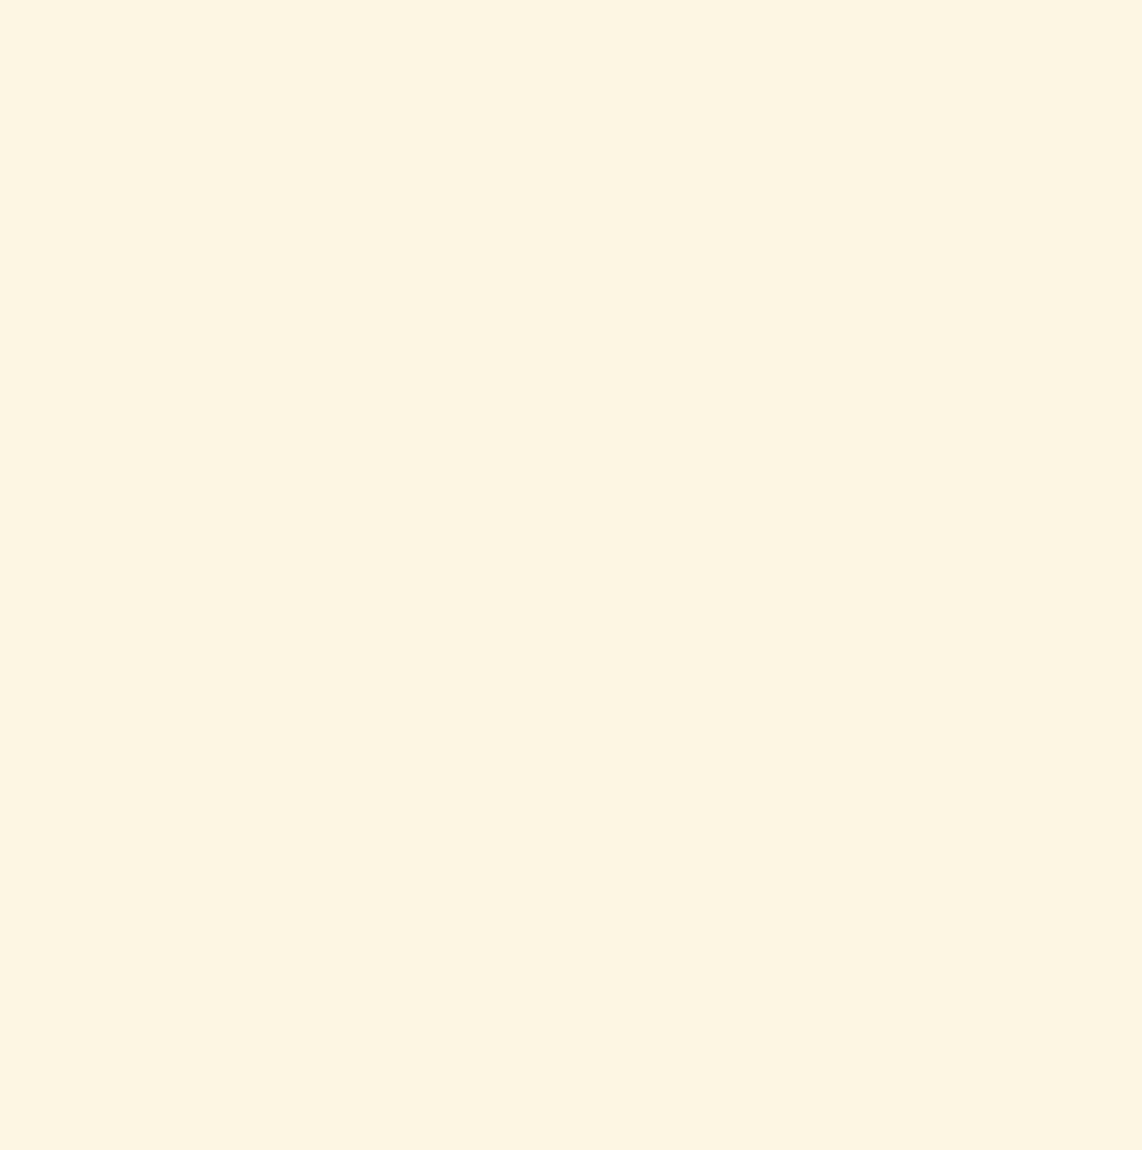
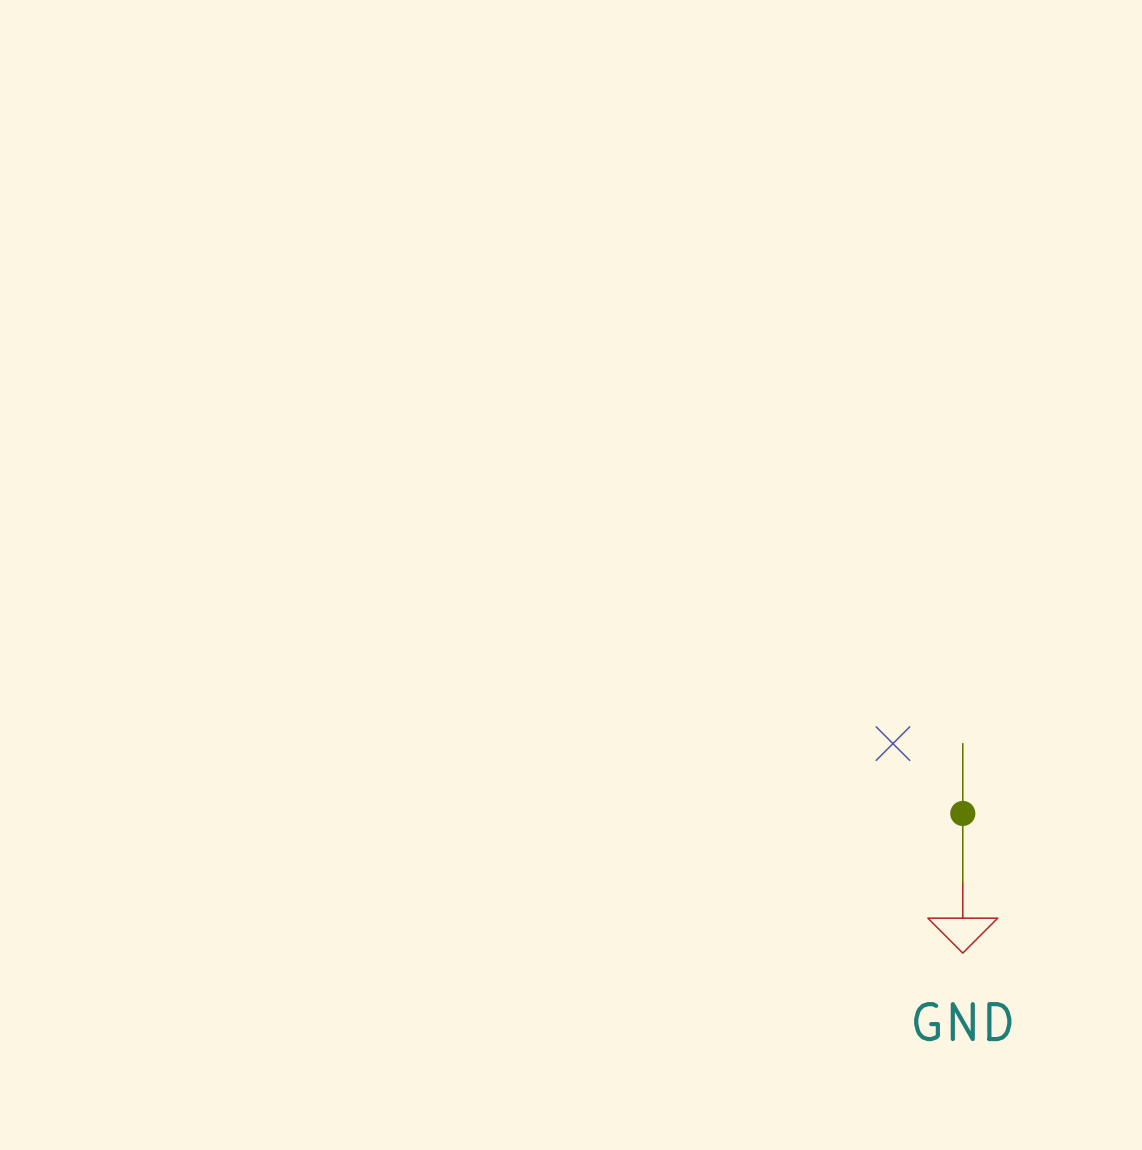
no-connect mark: none -> (892, 743)
wire: none -> (962, 743) (962, 883)
junction: none -> (962, 813)
power symbol: none -> GND (962, 918)

